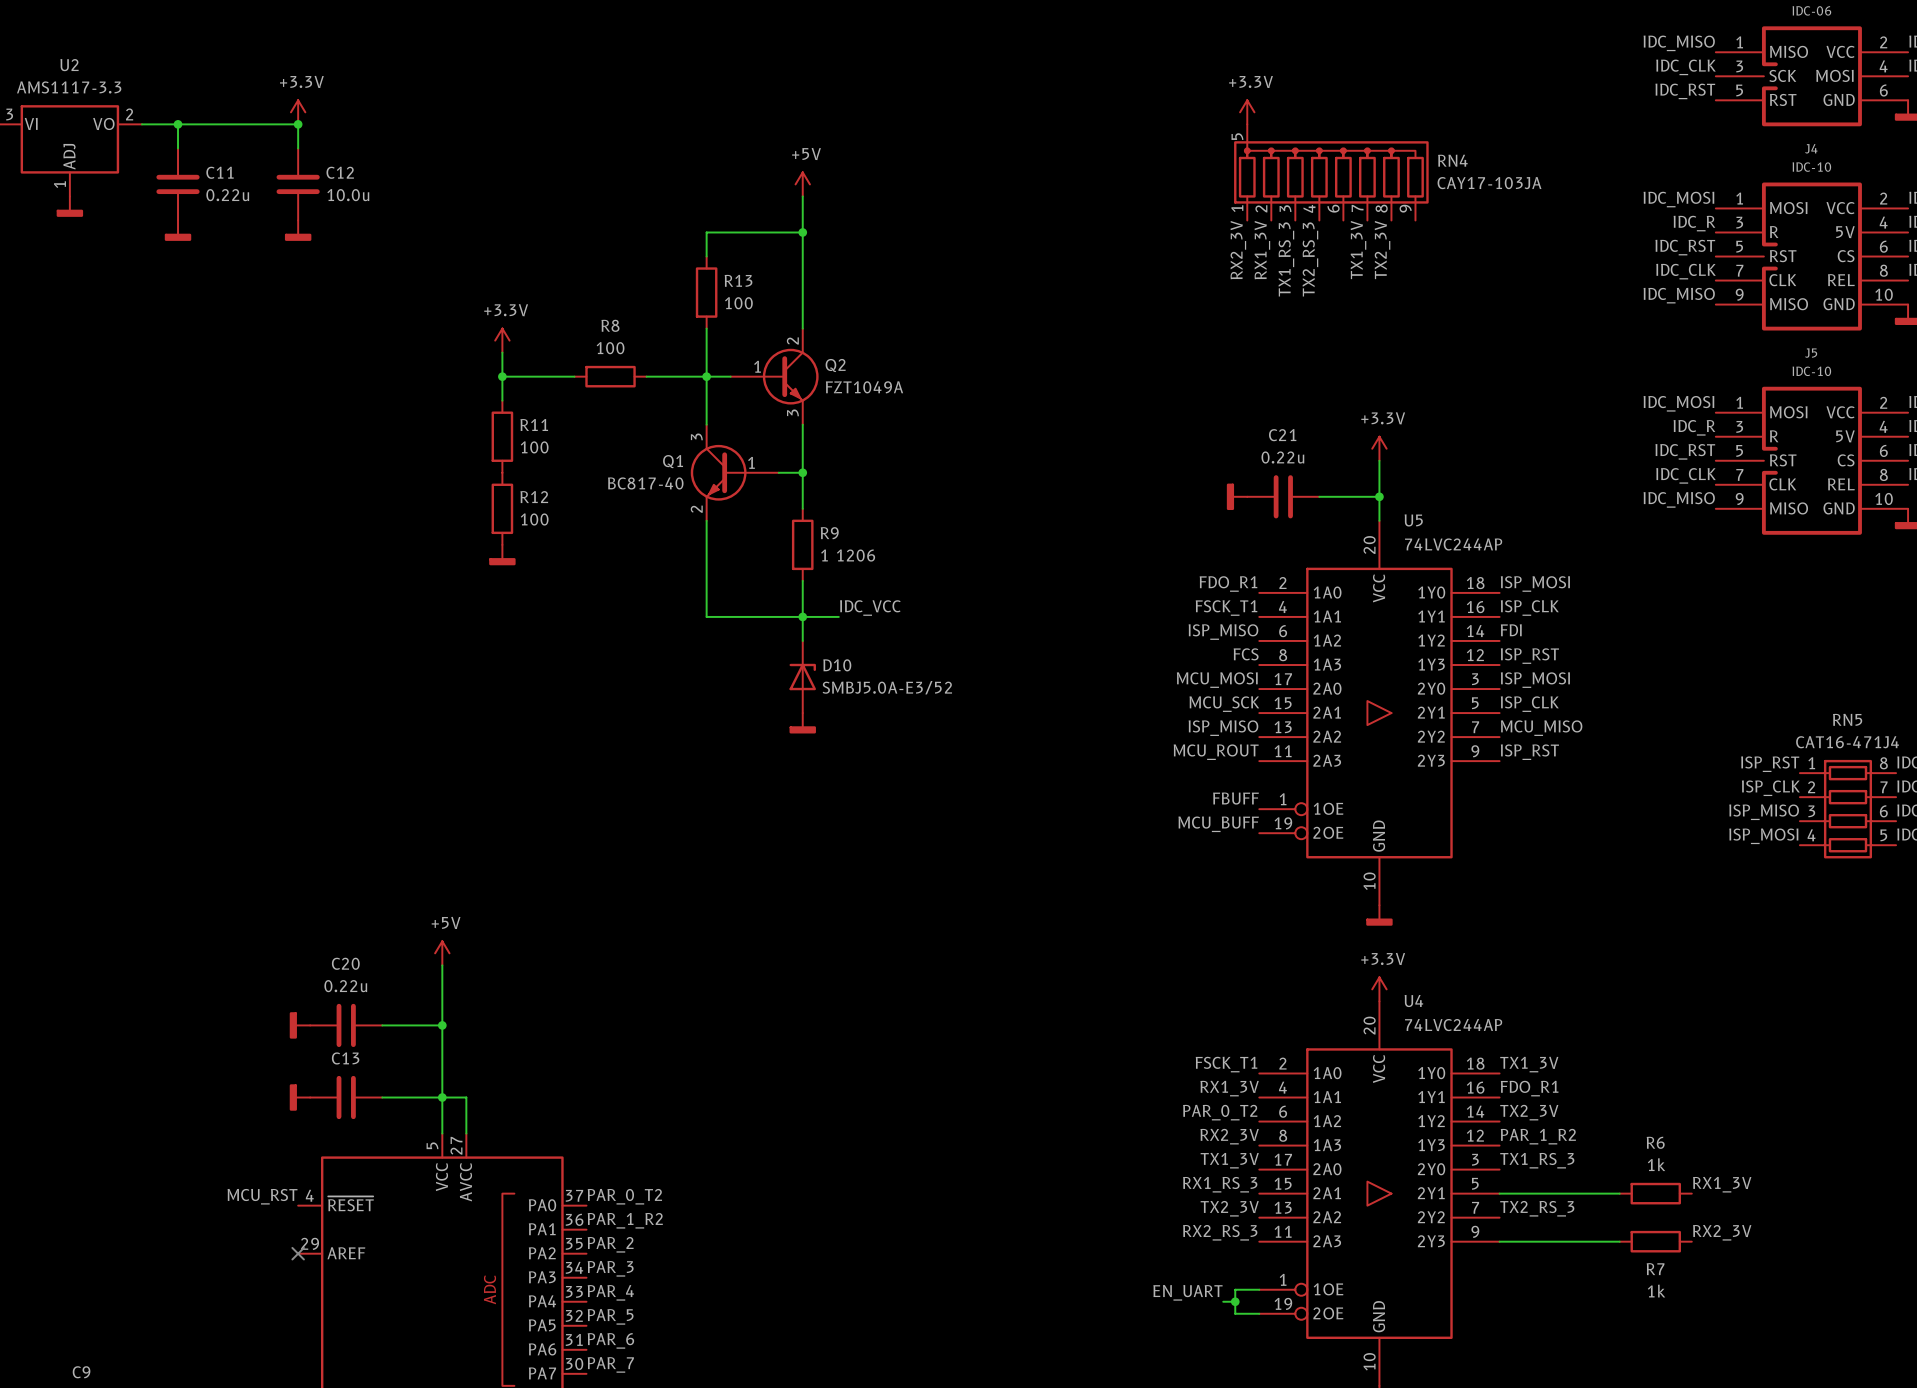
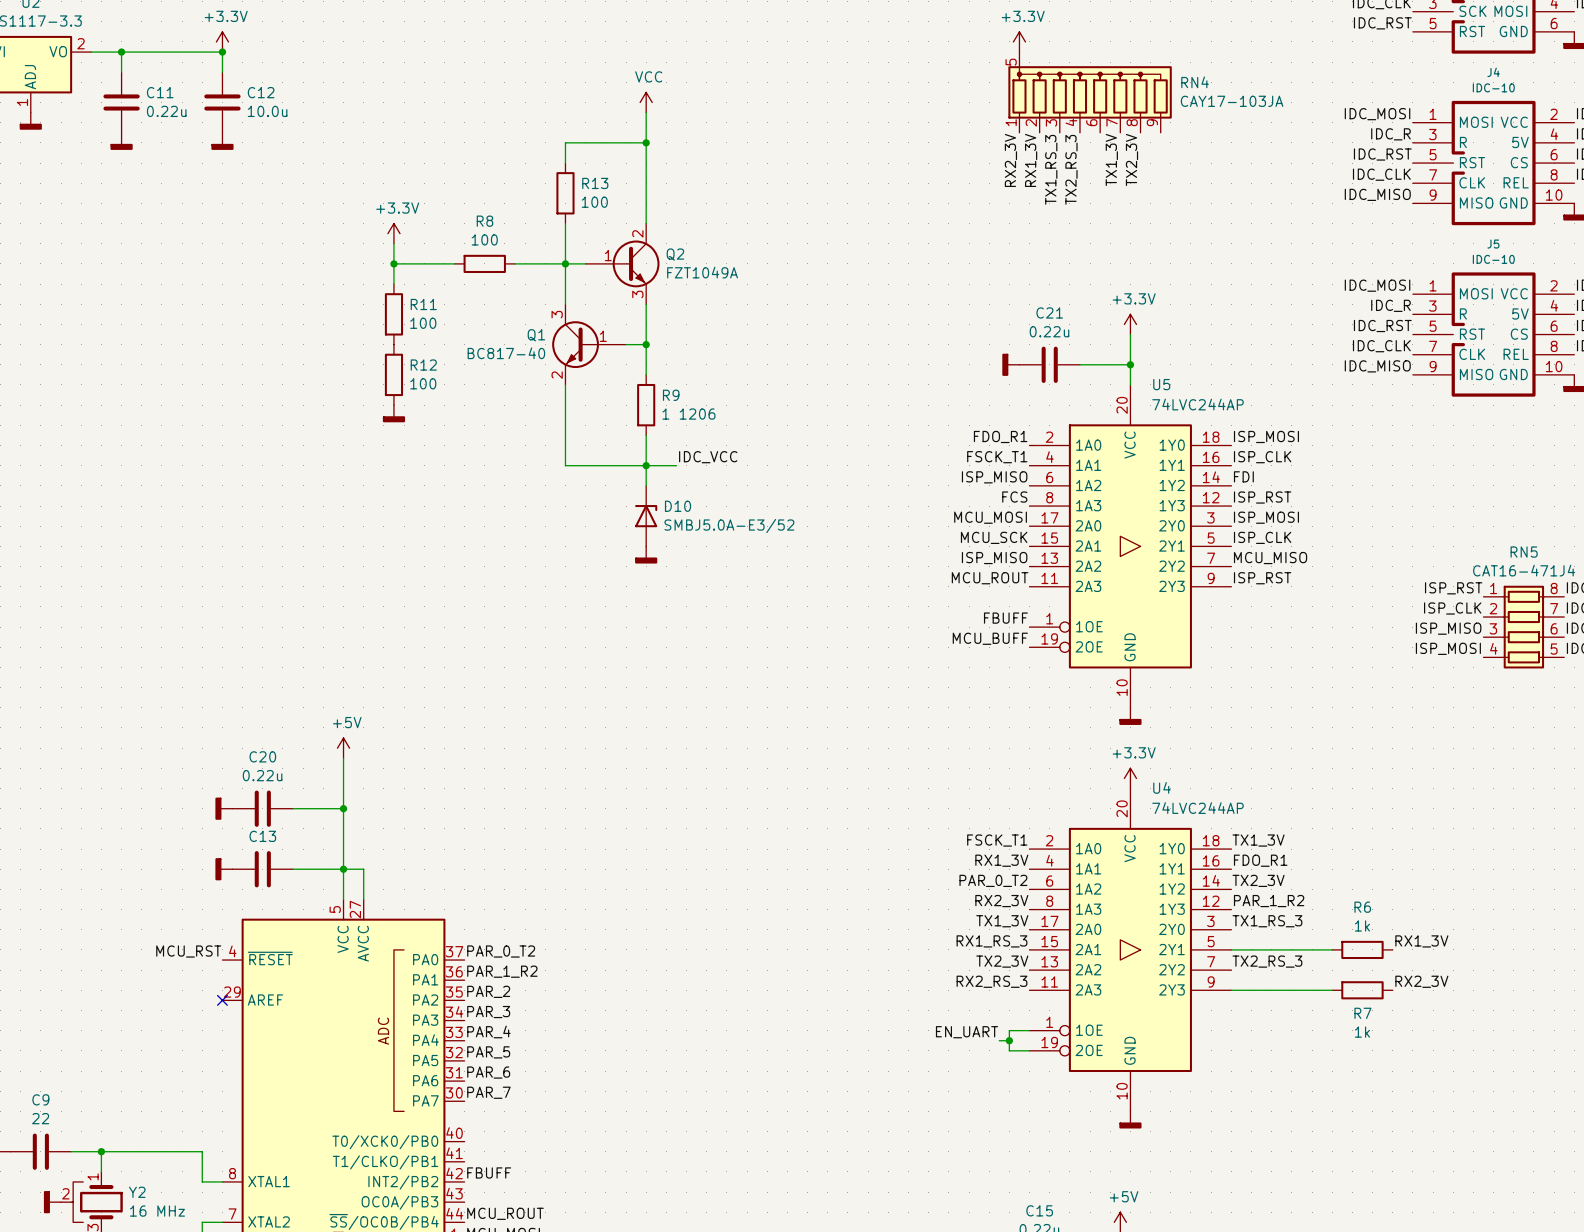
power symbol: +5V (802, 184) -> VCC (646, 102)

